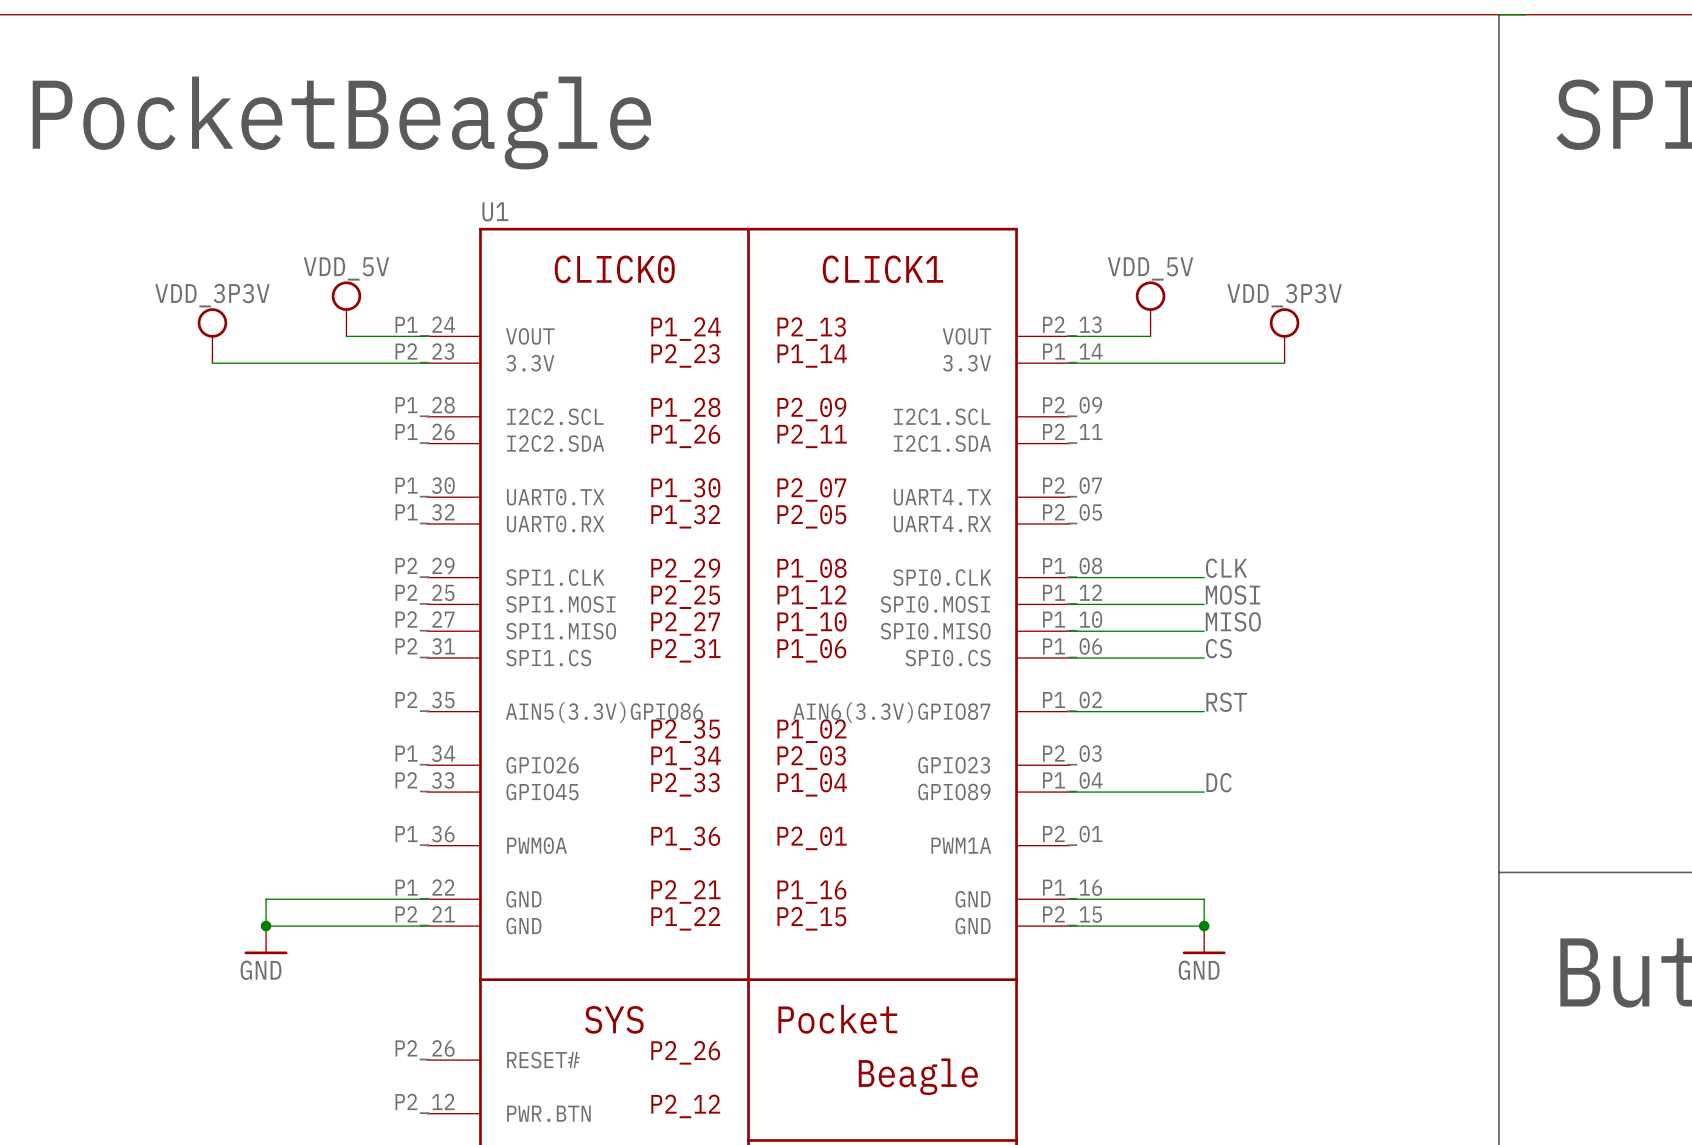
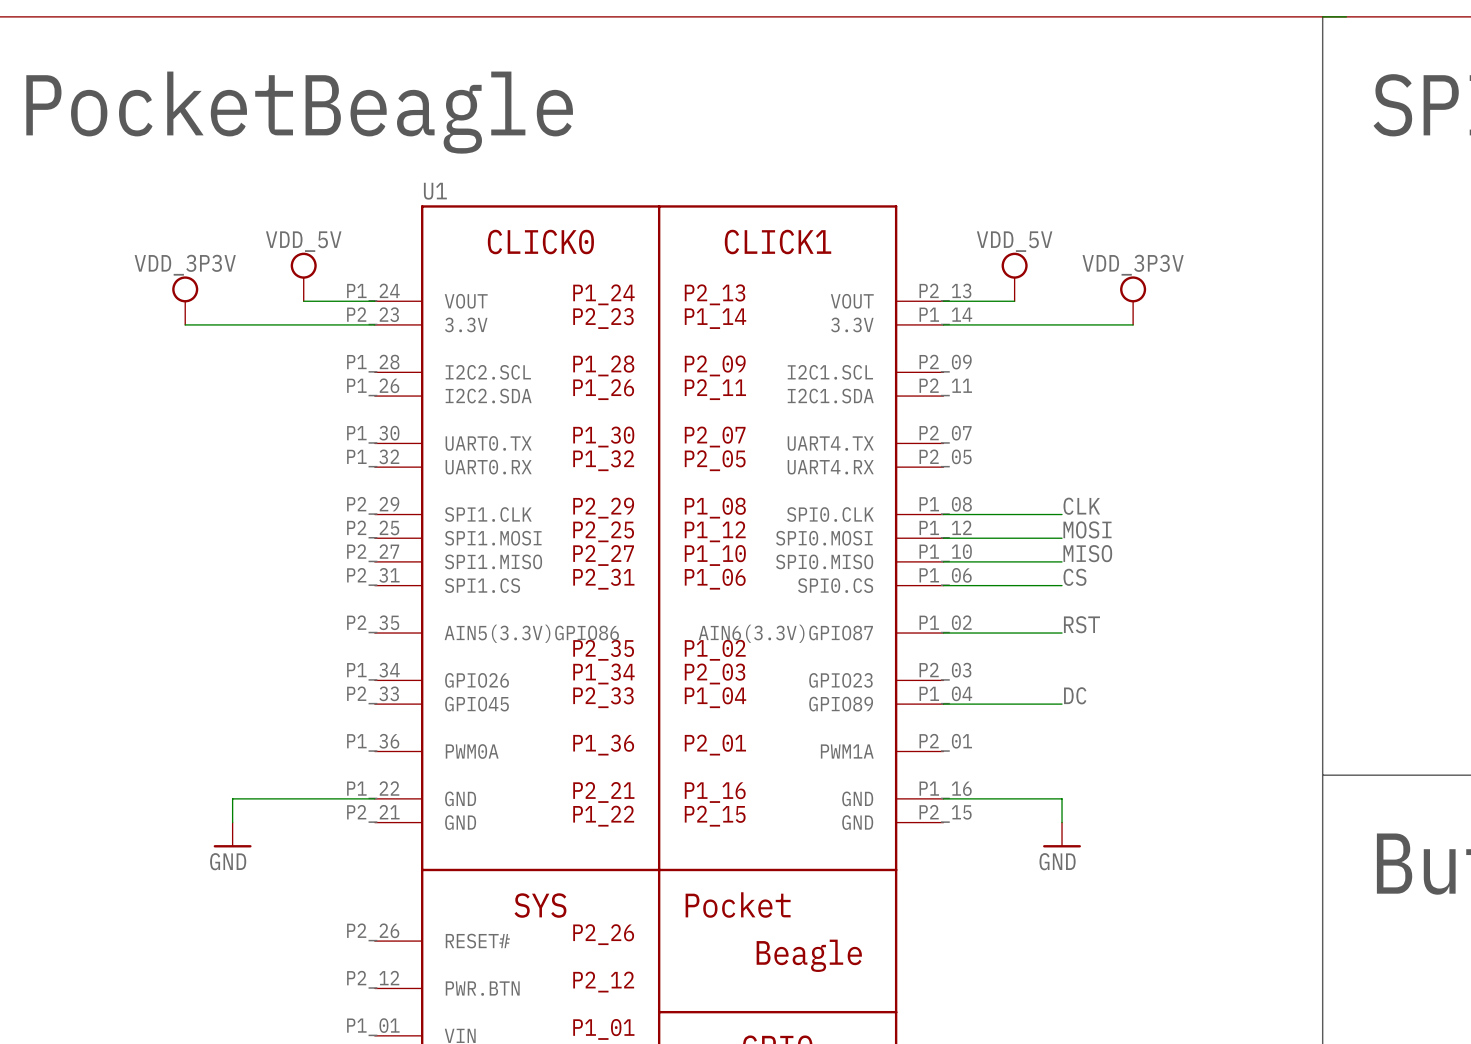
wire: (266, 926) (426, 926) -> none
junction: (266, 926) -> none
wire: (1070, 926) (1204, 926) -> none
junction: (1204, 926) -> none

